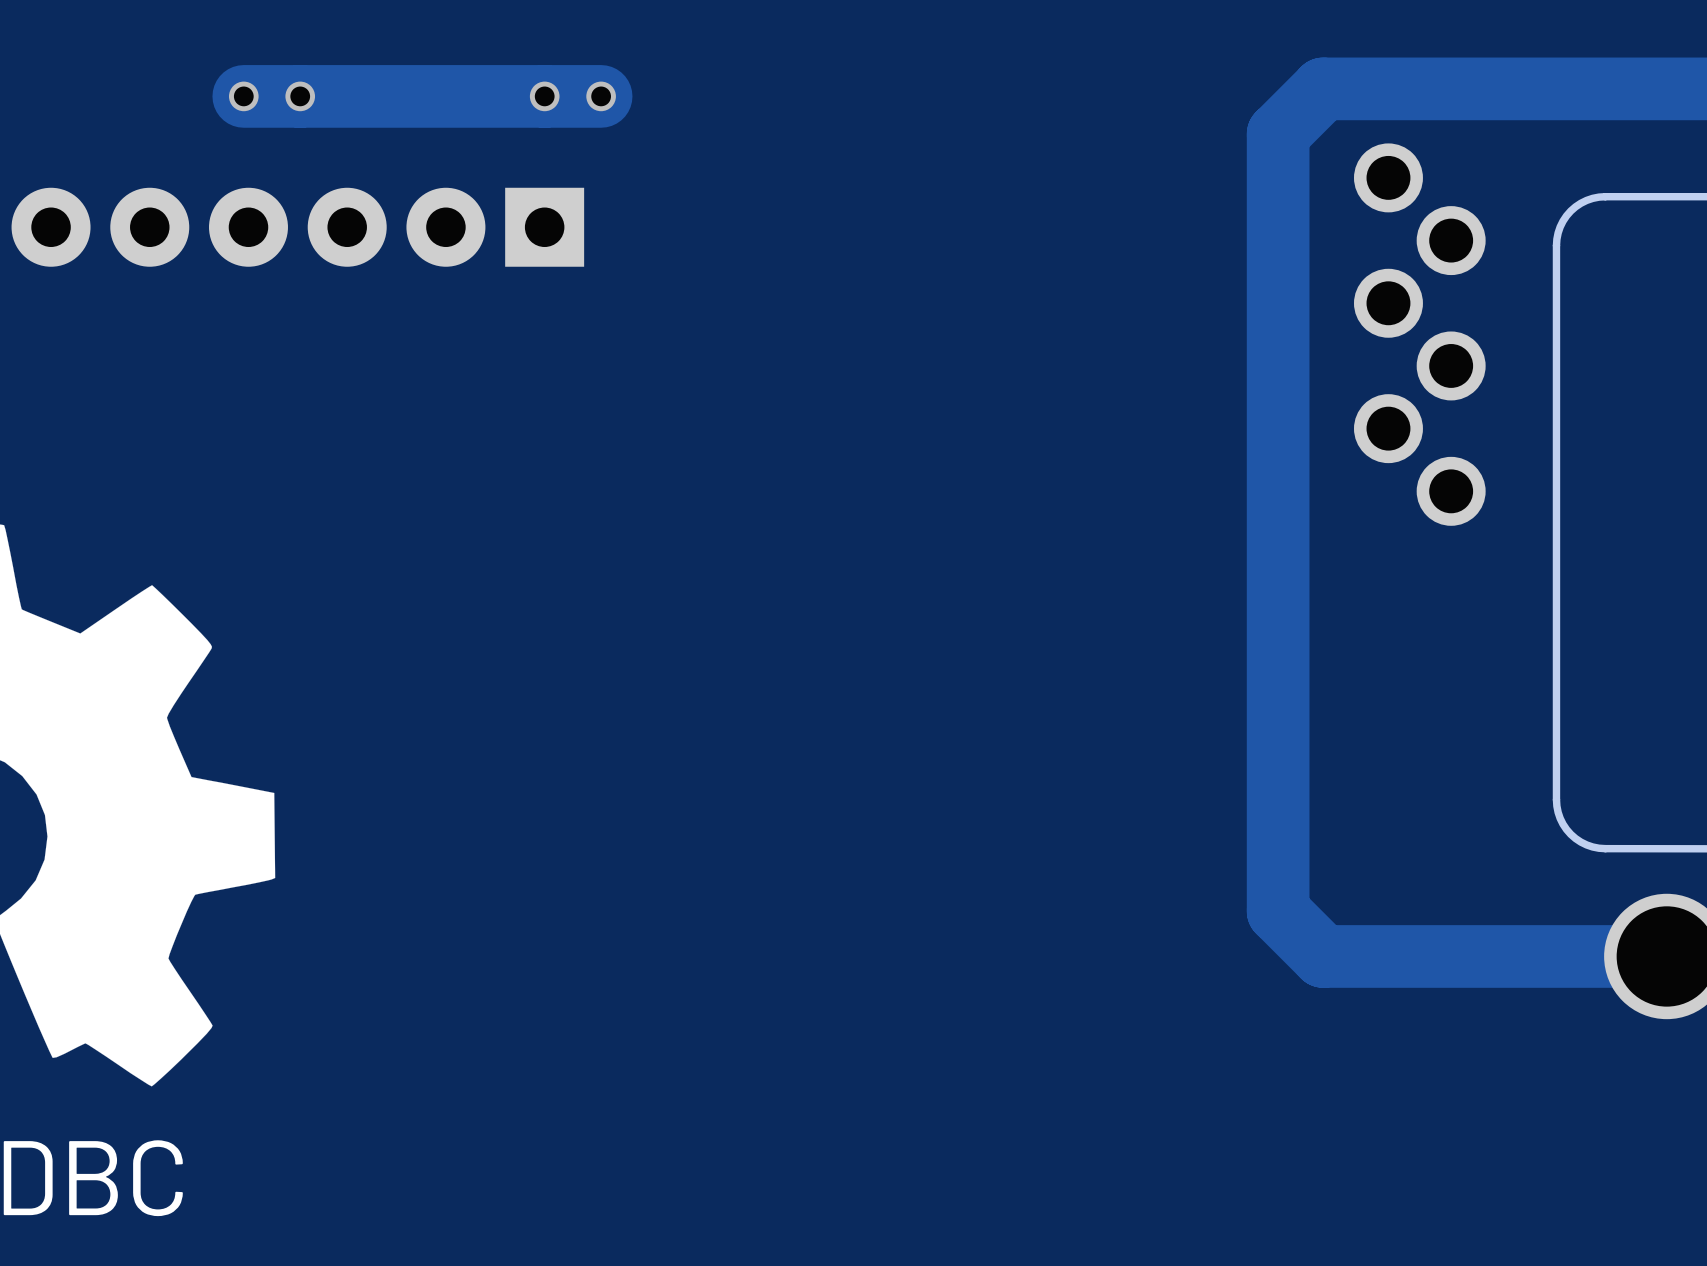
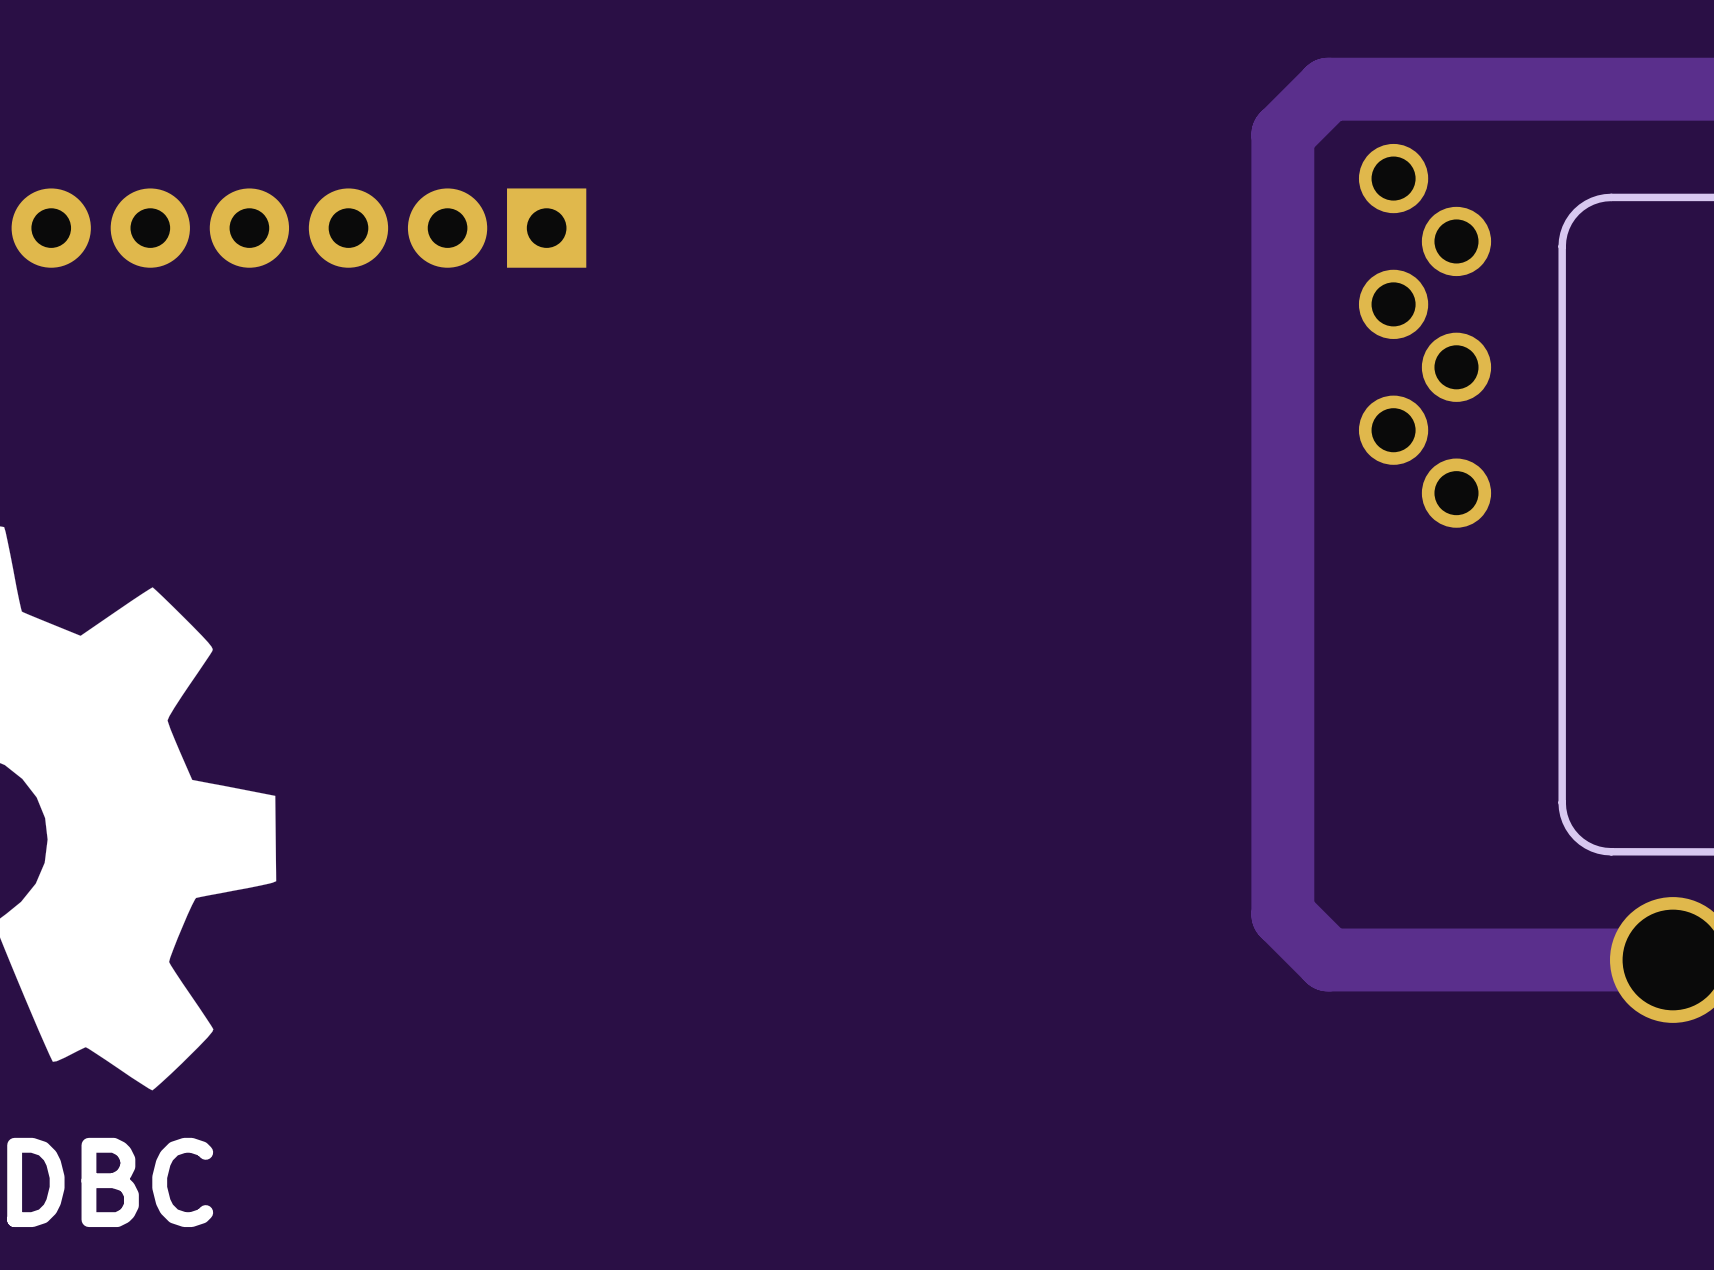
via: (243, 96) -> none
via: (300, 96) -> none
via: (544, 96) -> none
track: (601, 96) (243, 96) -> none
via: (601, 96) -> none

